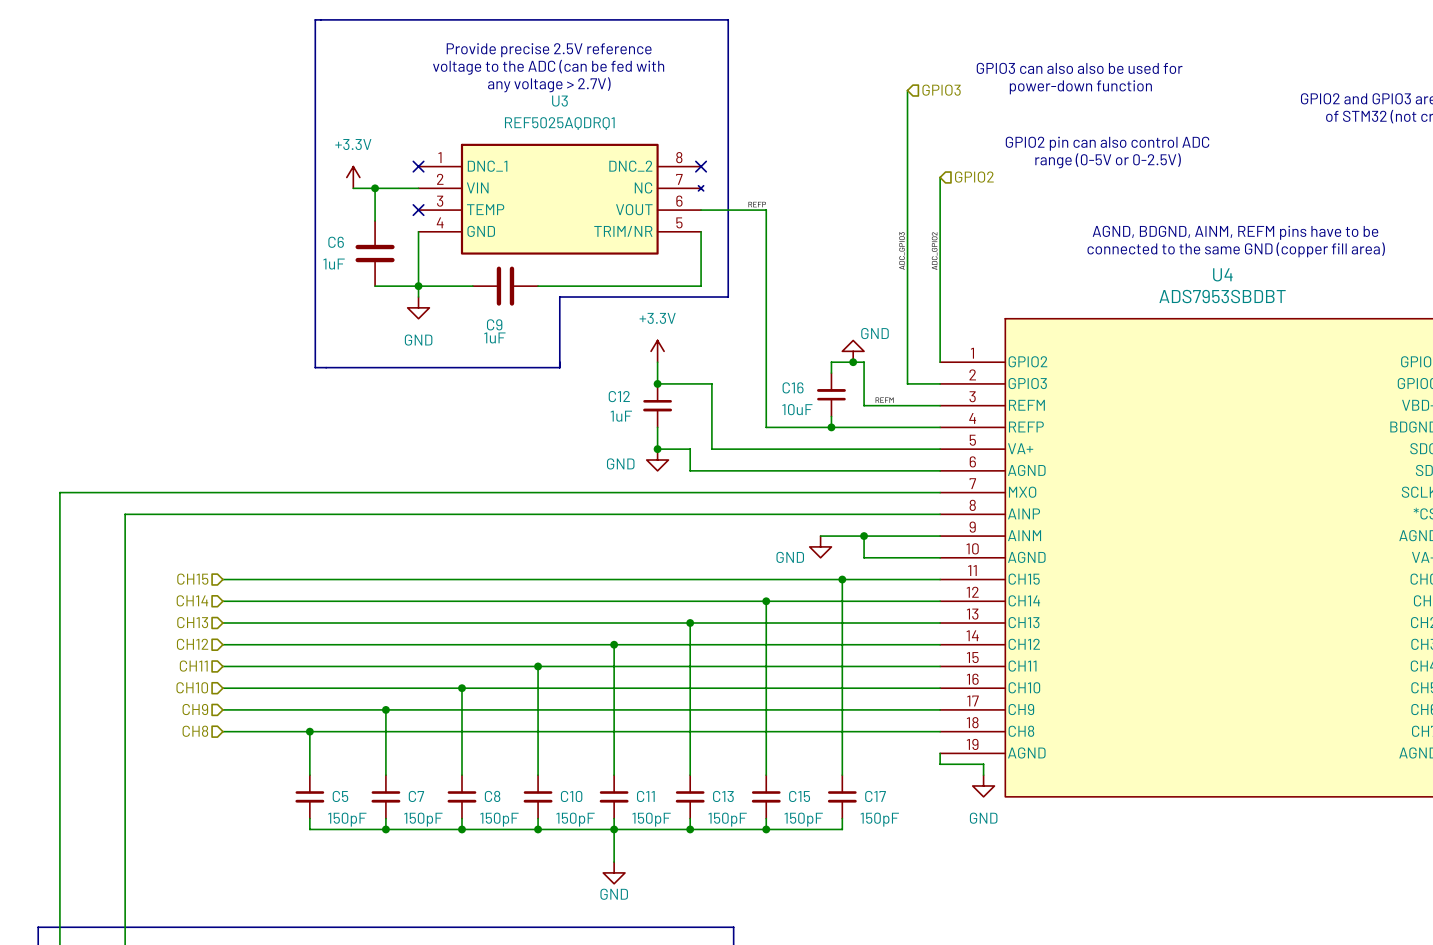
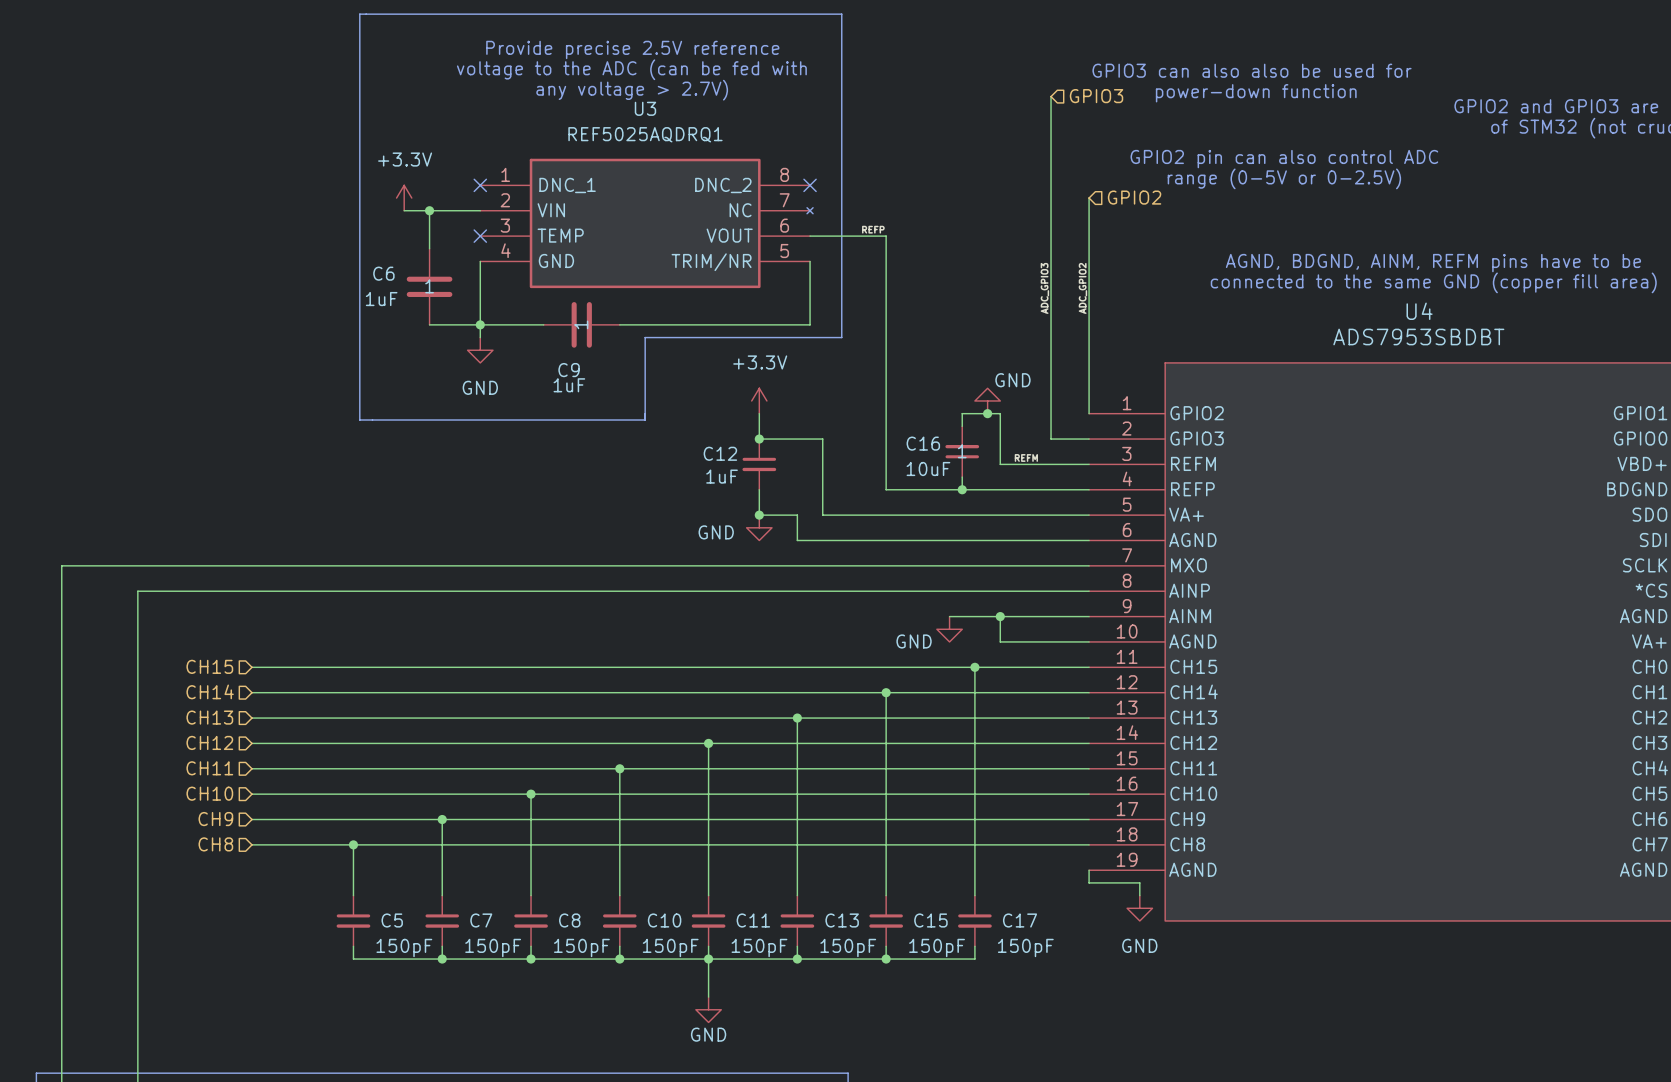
C6 text: none -> 1 (429, 286)
C9 text: none -> 1 (581, 324)
C16 text: none -> 1 (962, 451)

